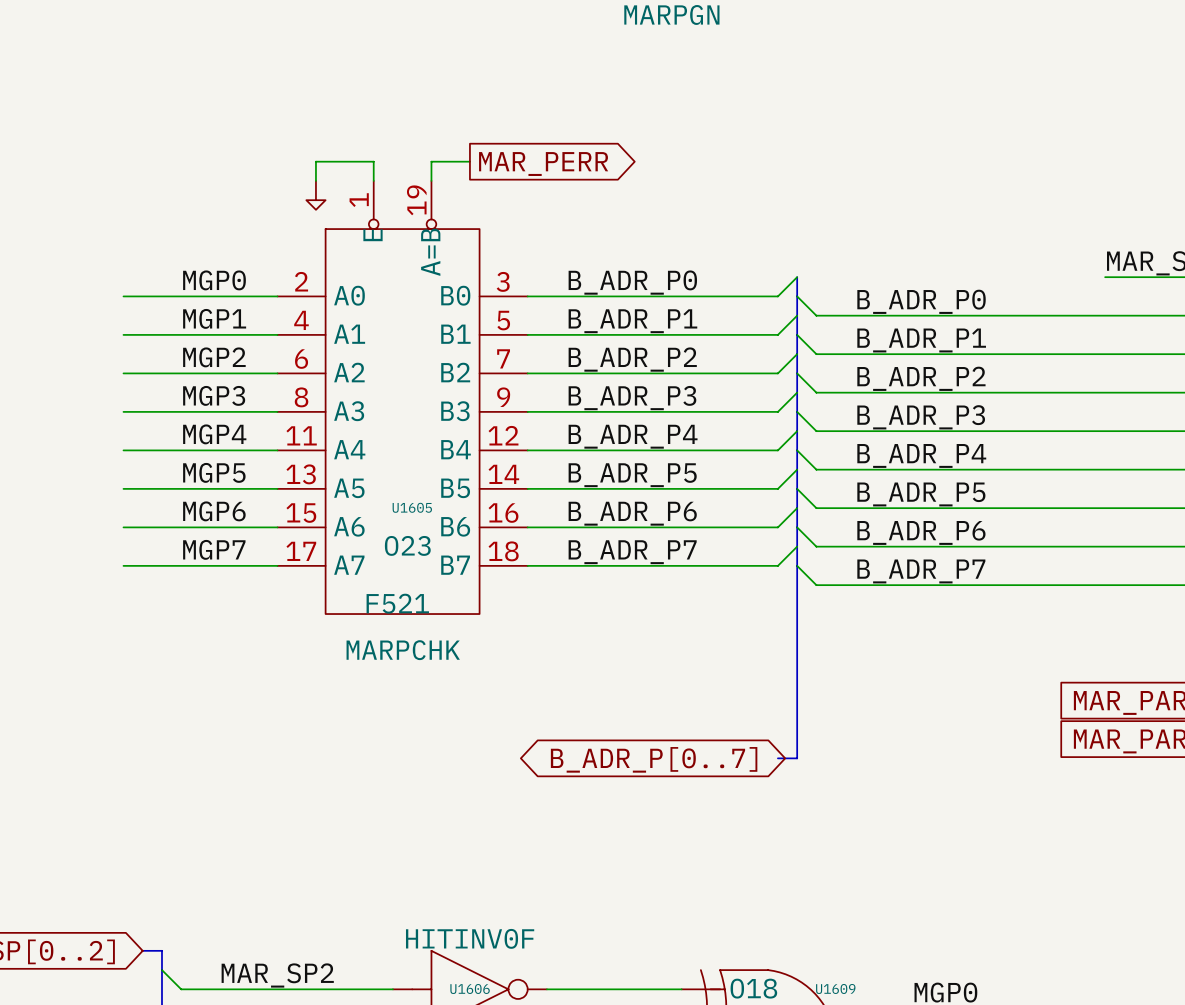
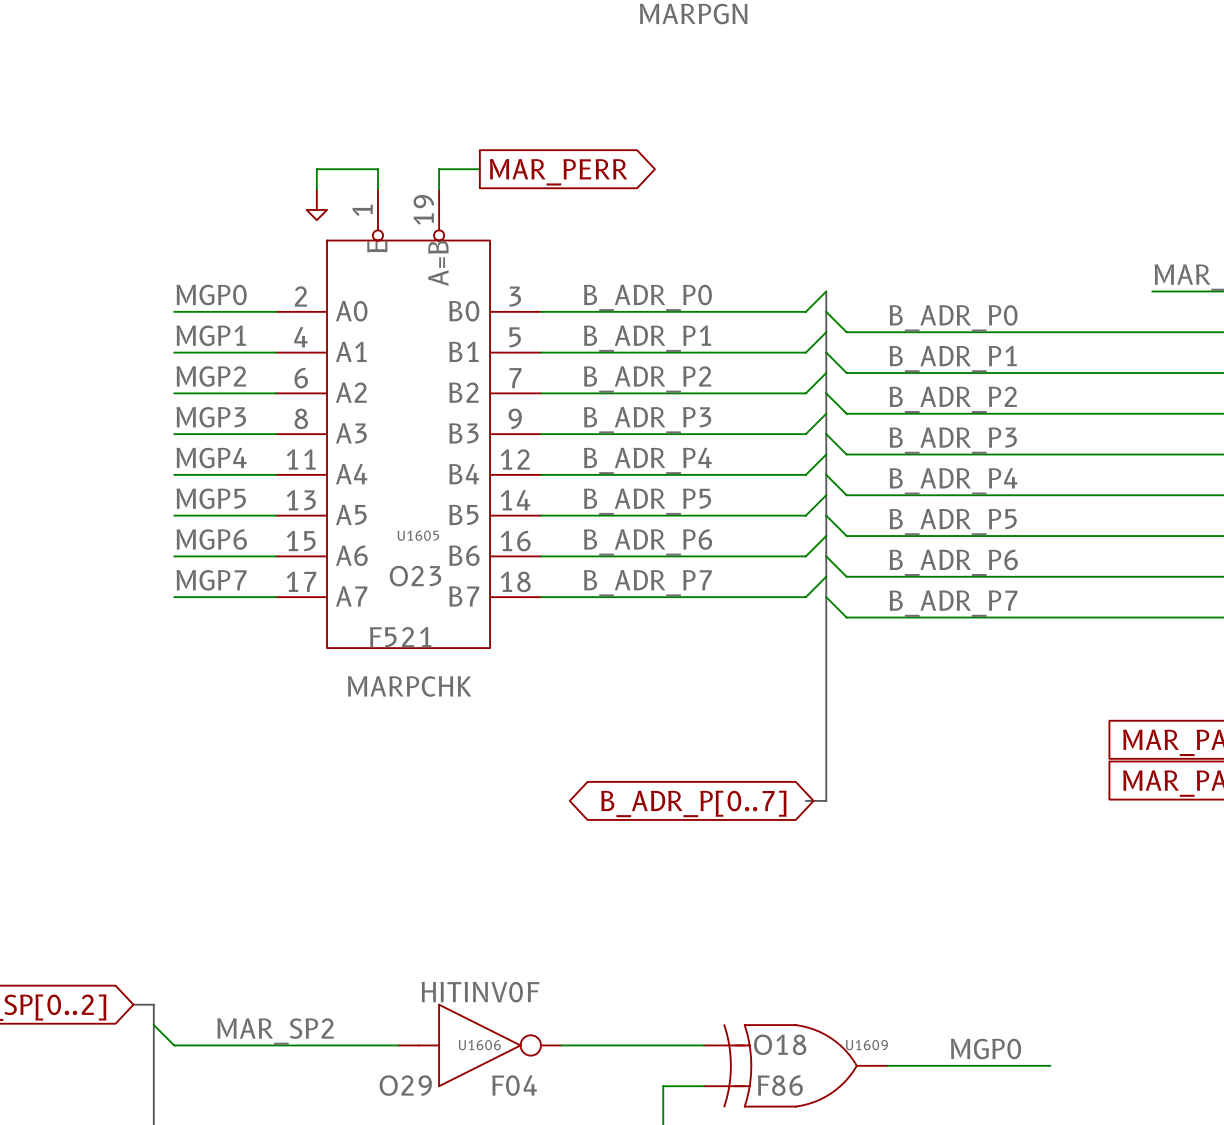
wire: (123, 296) (181, 296) -> none
wire: (123, 334) (181, 334) -> none
wire: (123, 373) (181, 373) -> none
wire: (123, 411) (181, 411) -> none
wire: (123, 450) (181, 450) -> none
wire: (123, 488) (181, 488) -> none
wire: (123, 527) (181, 527) -> none
wire: (123, 565) (181, 565) -> none

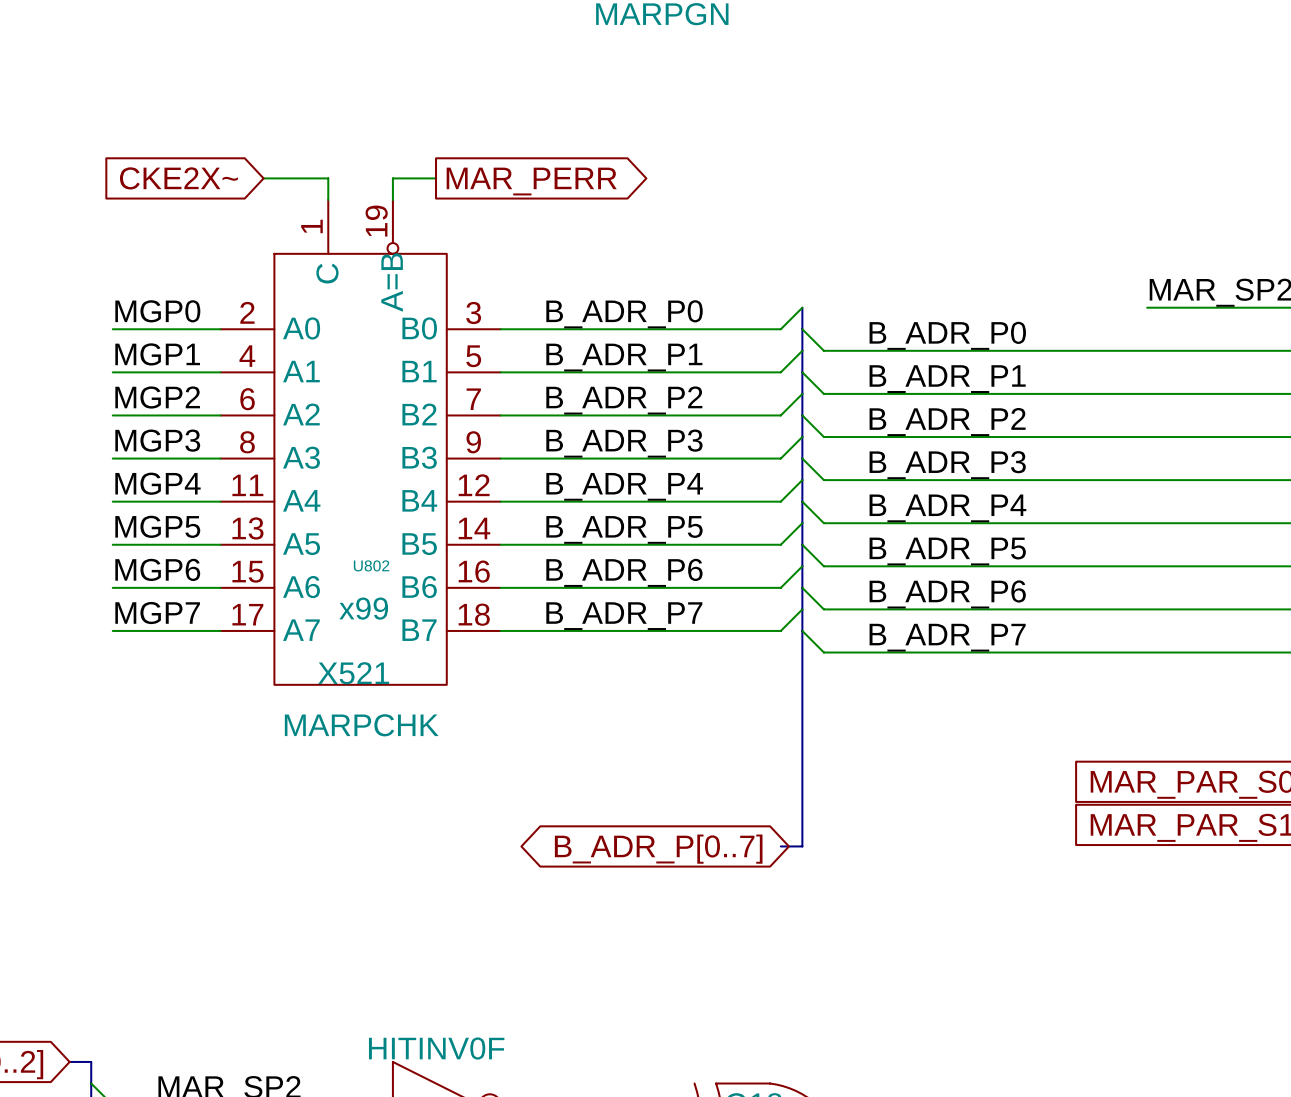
global label: none -> CKE2X~ (178, 178)
wire: (316, 169) (316, 189) -> none
power symbol: (316, 205) -> none
U1605: F521 (408, 418) -> none
U802: none -> X521 (360, 442)

